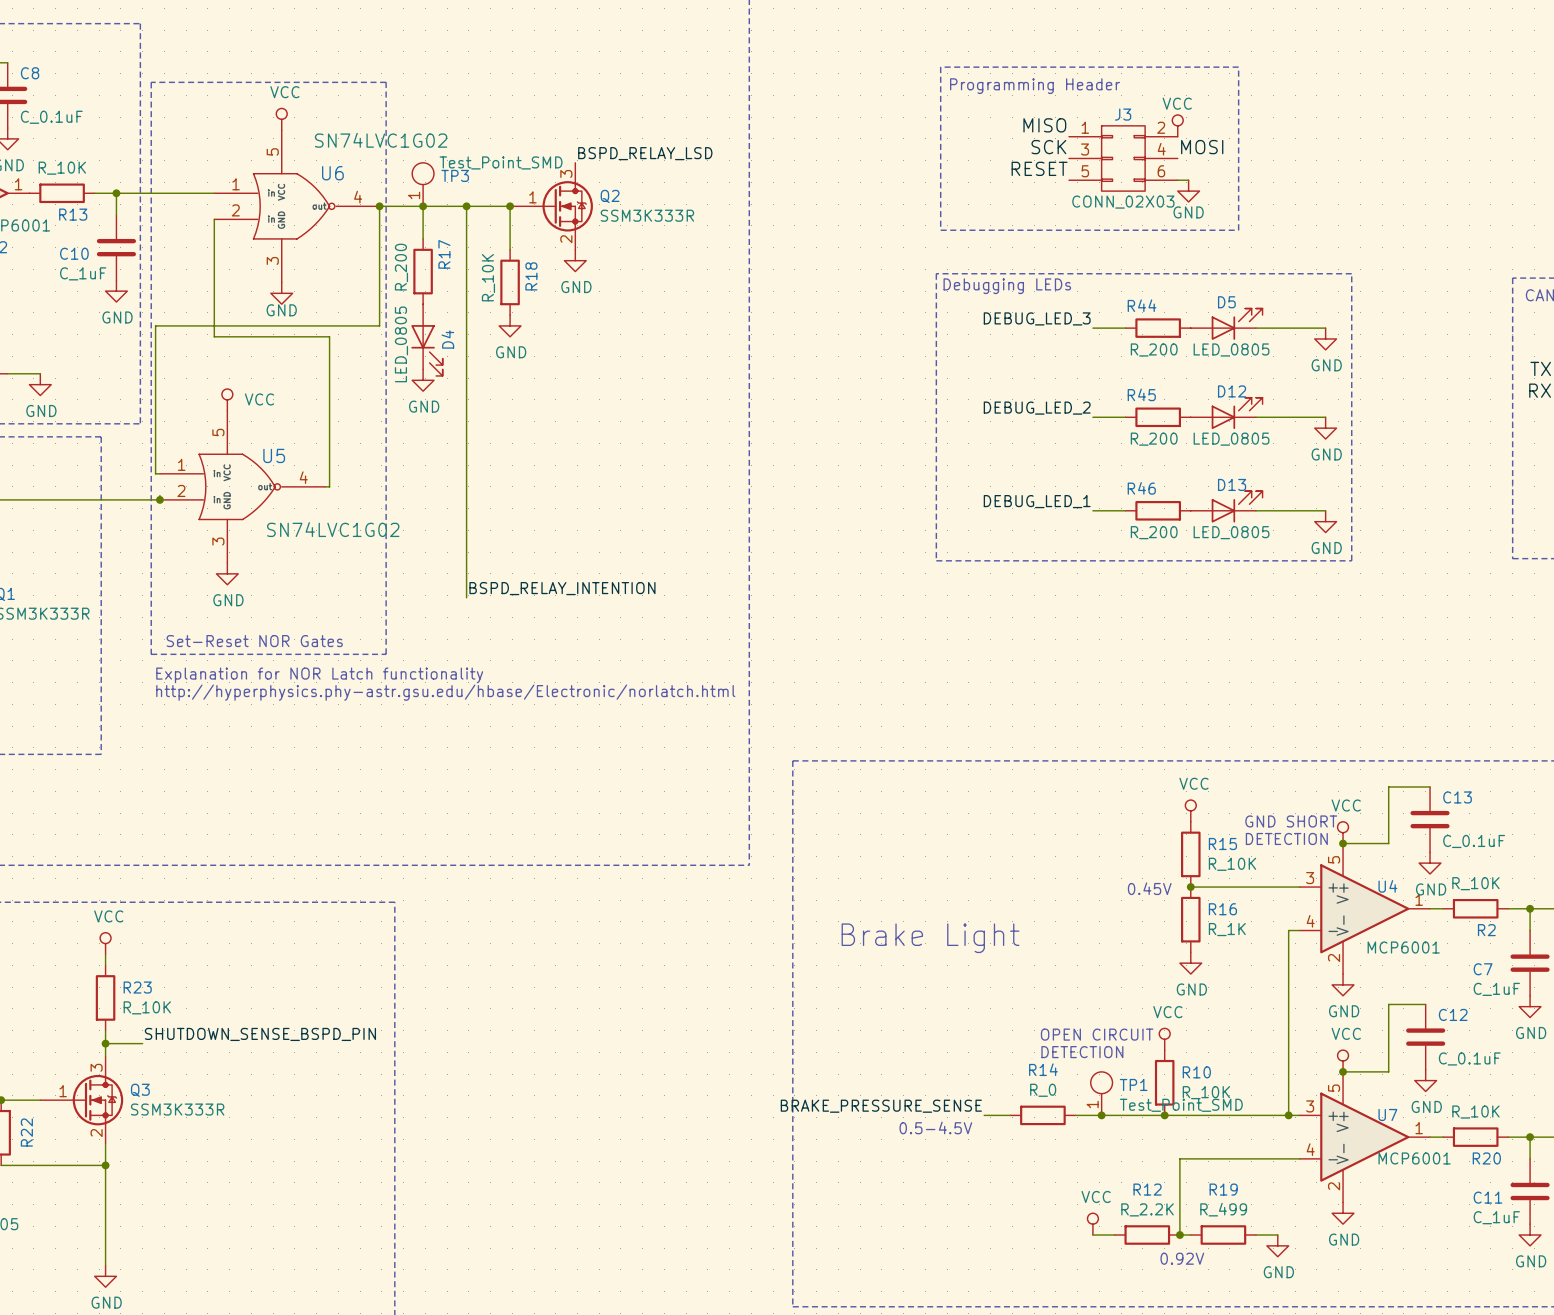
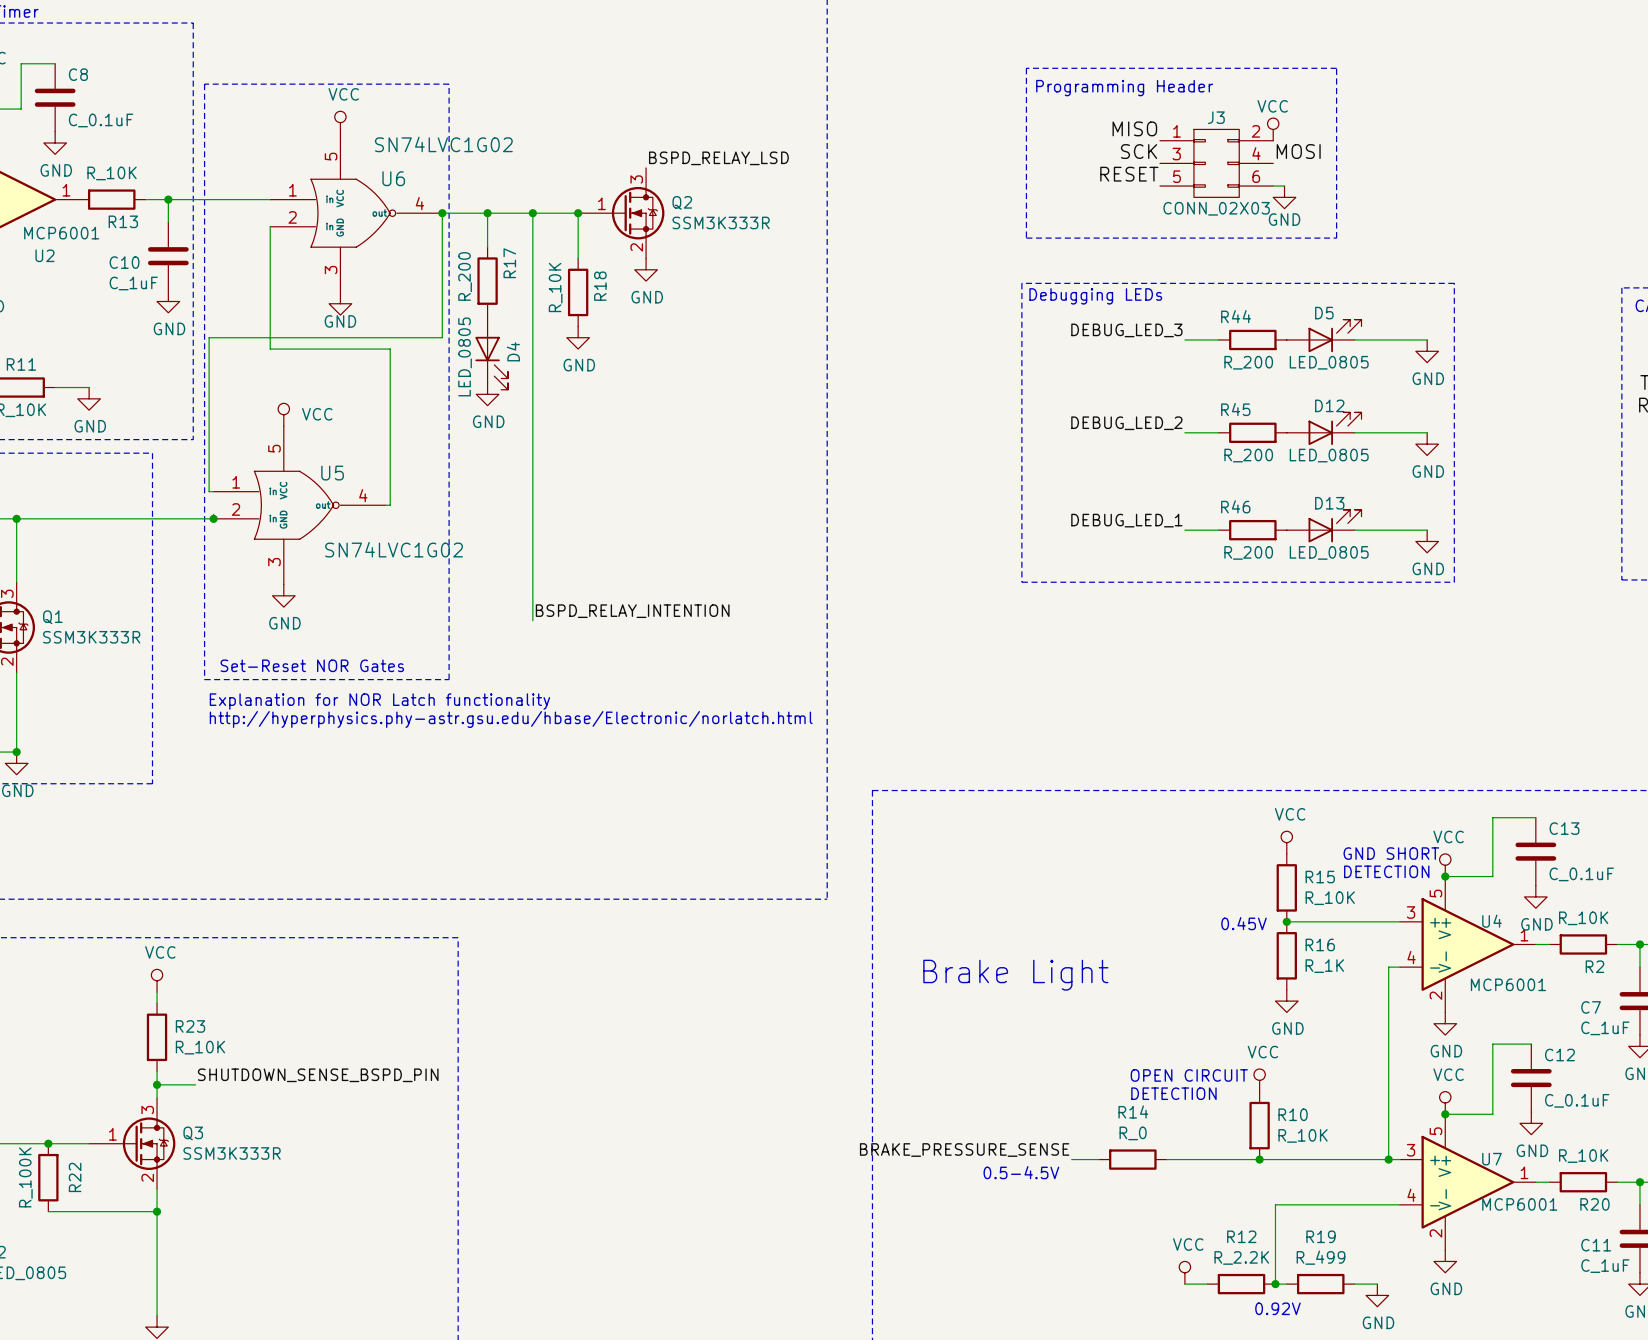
TP3: Test_Point_SMD (423, 184) -> none
TP1: Test_Point_SMD (1101, 1093) -> none
junction: (1101, 1115) -> none

